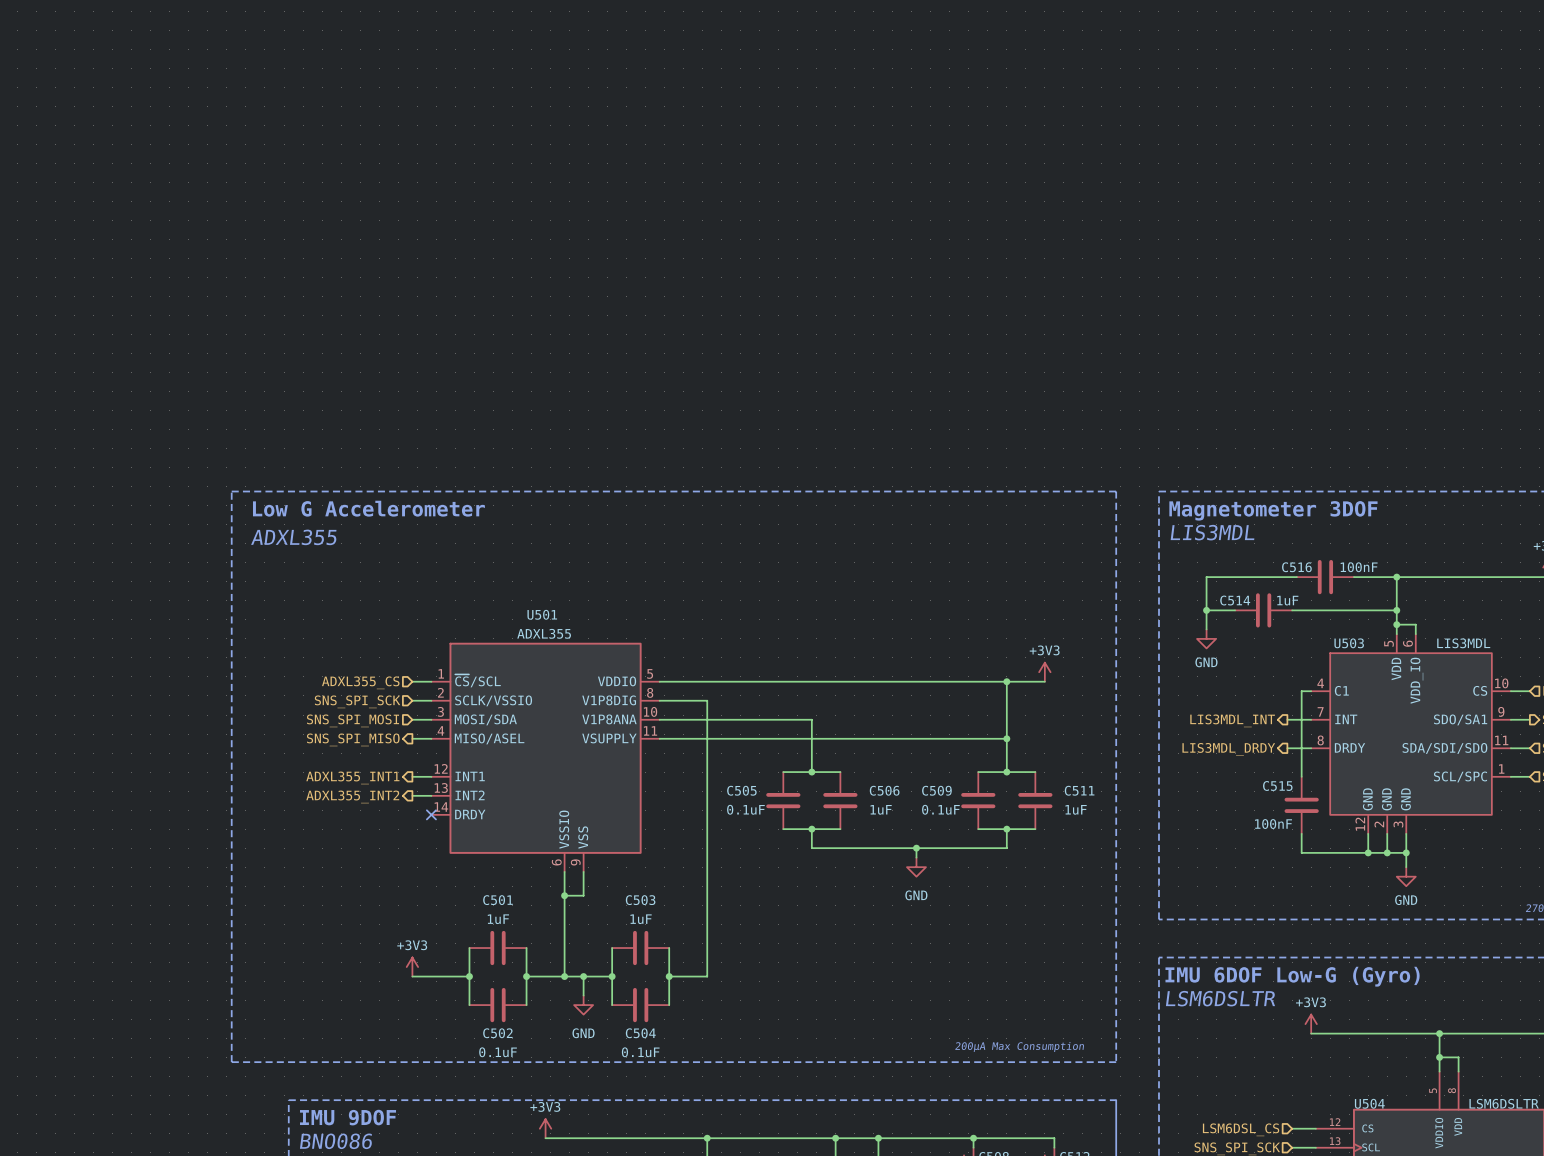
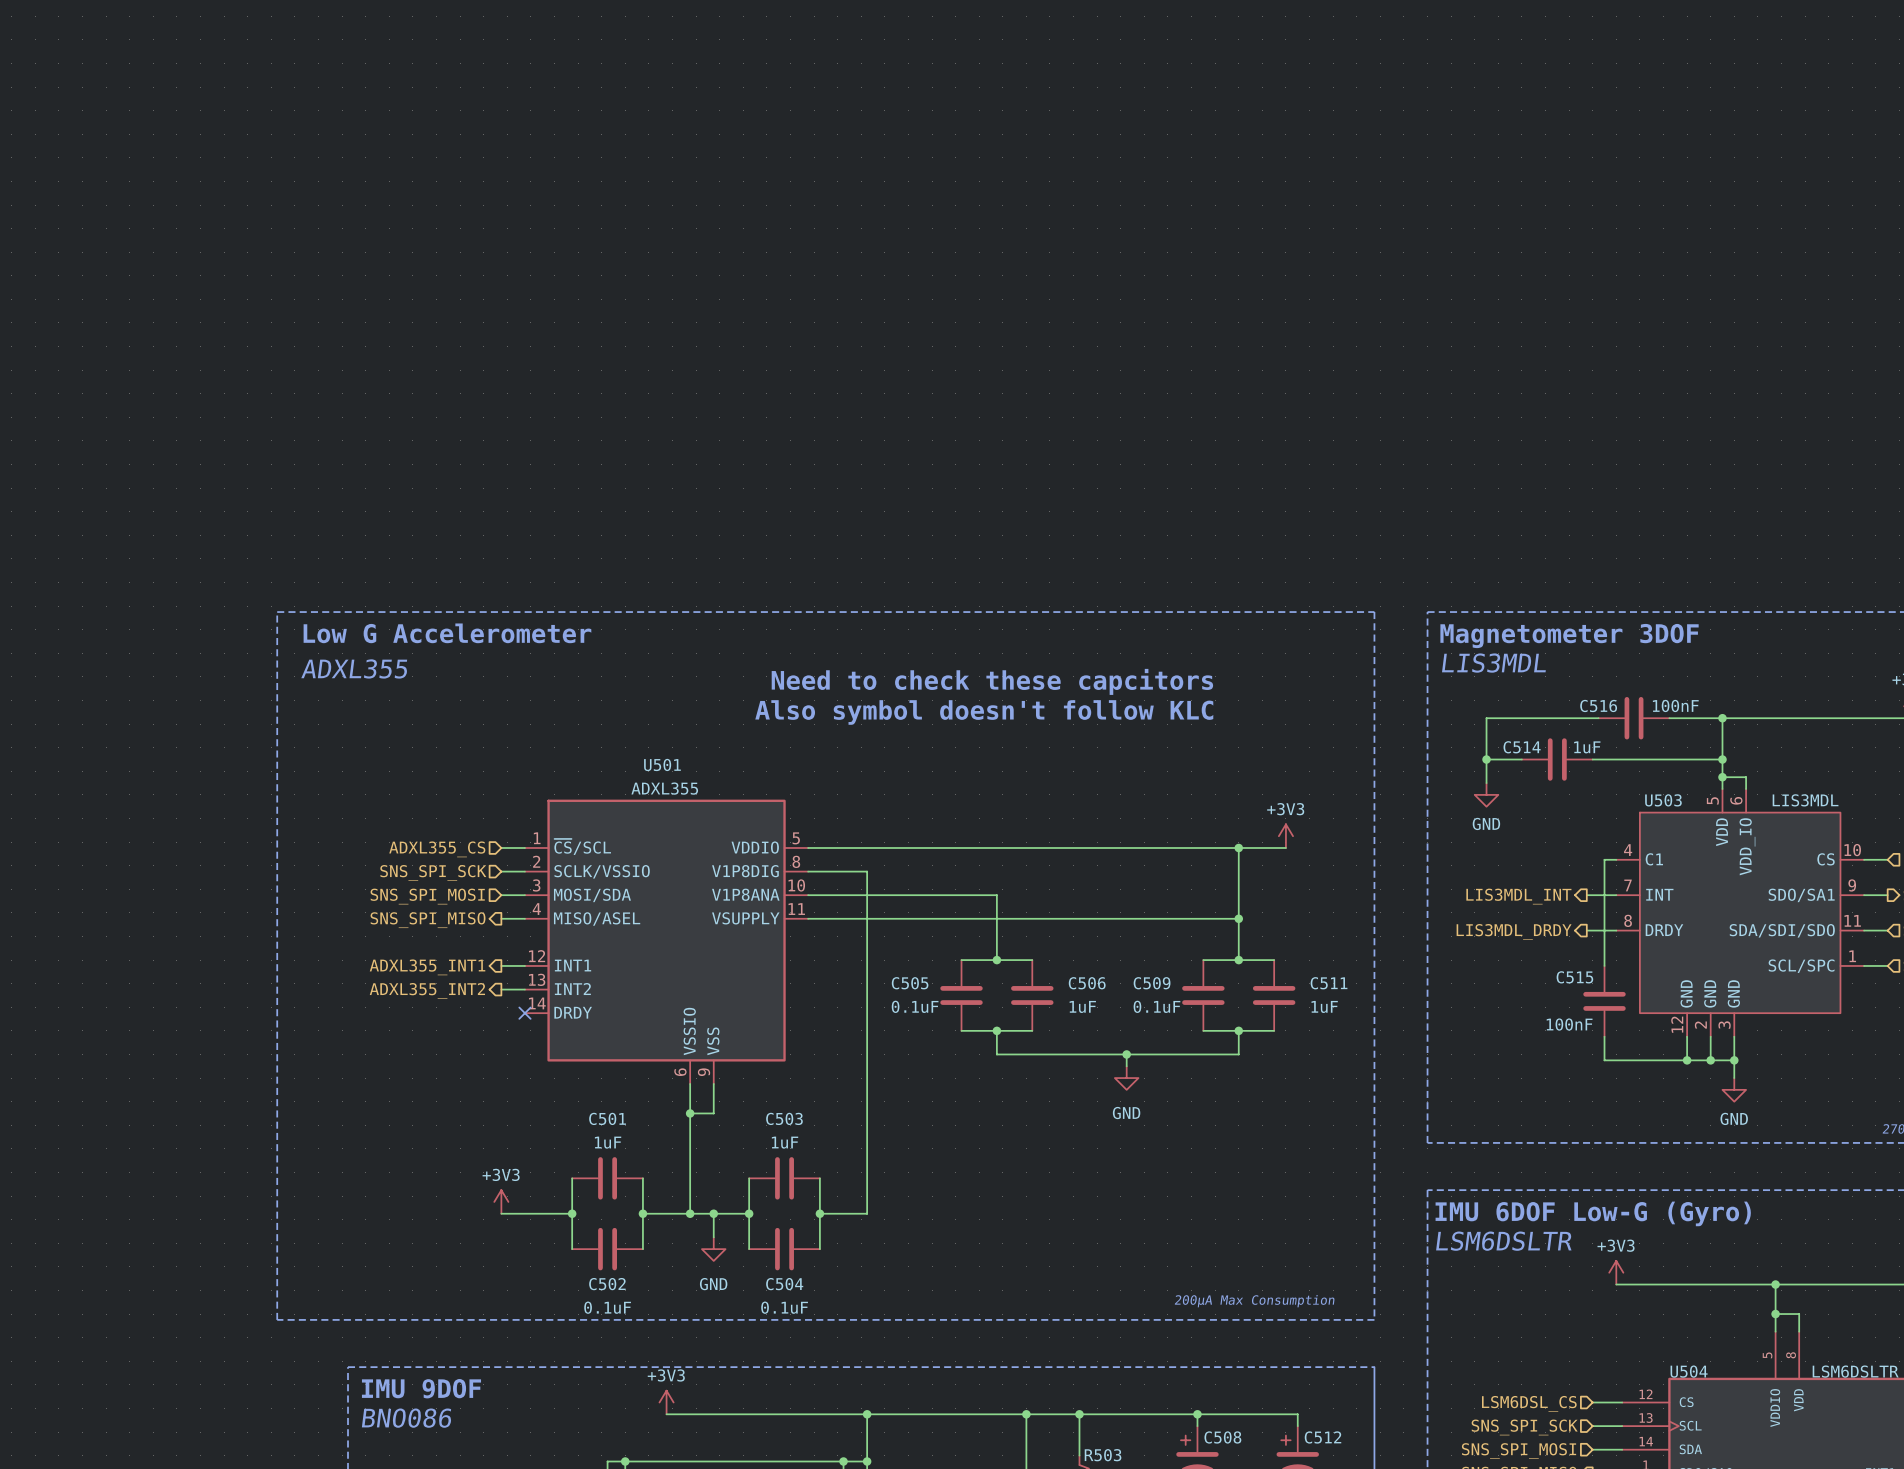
text: none -> Need to check these capcitors (992, 681)
text: none -> Also symbol doesn't follow KLC (984, 712)

